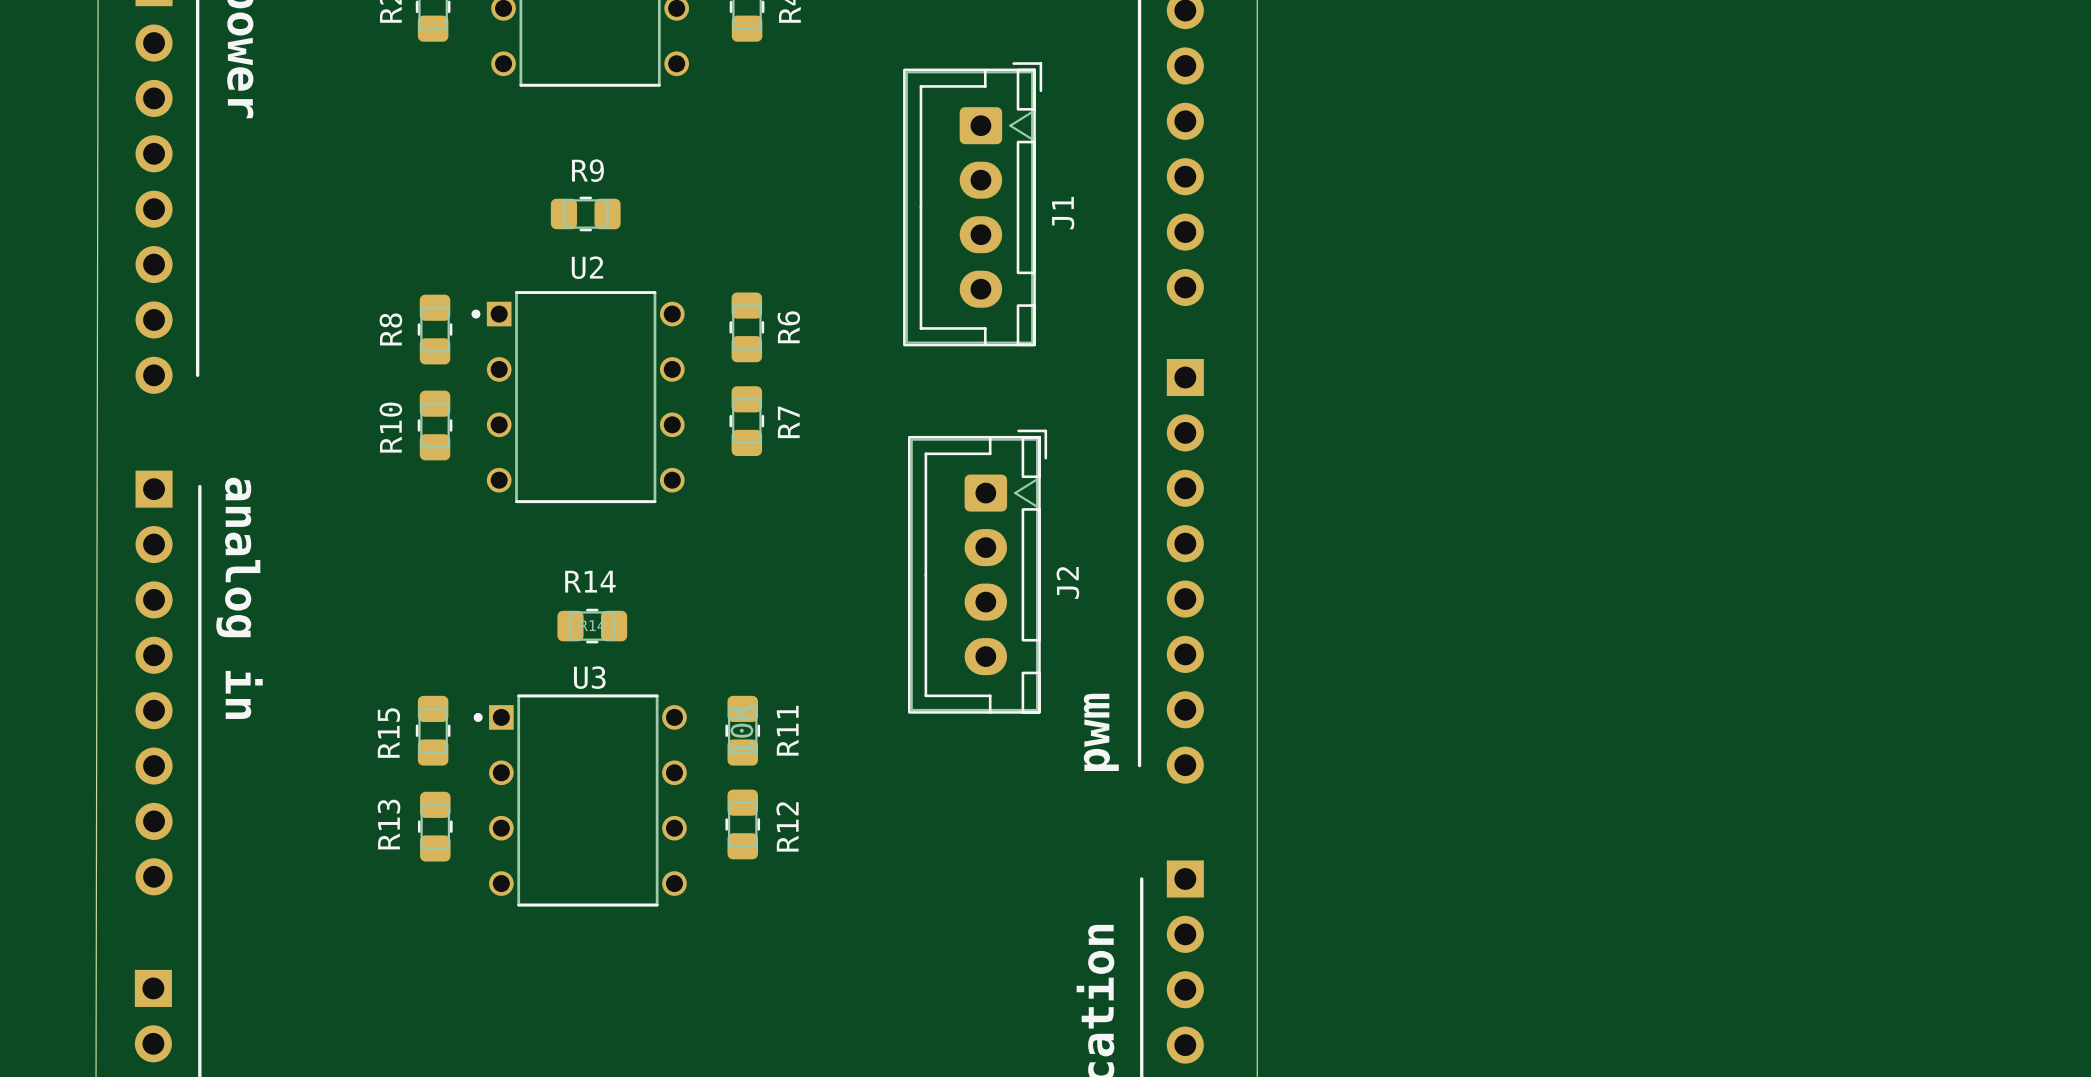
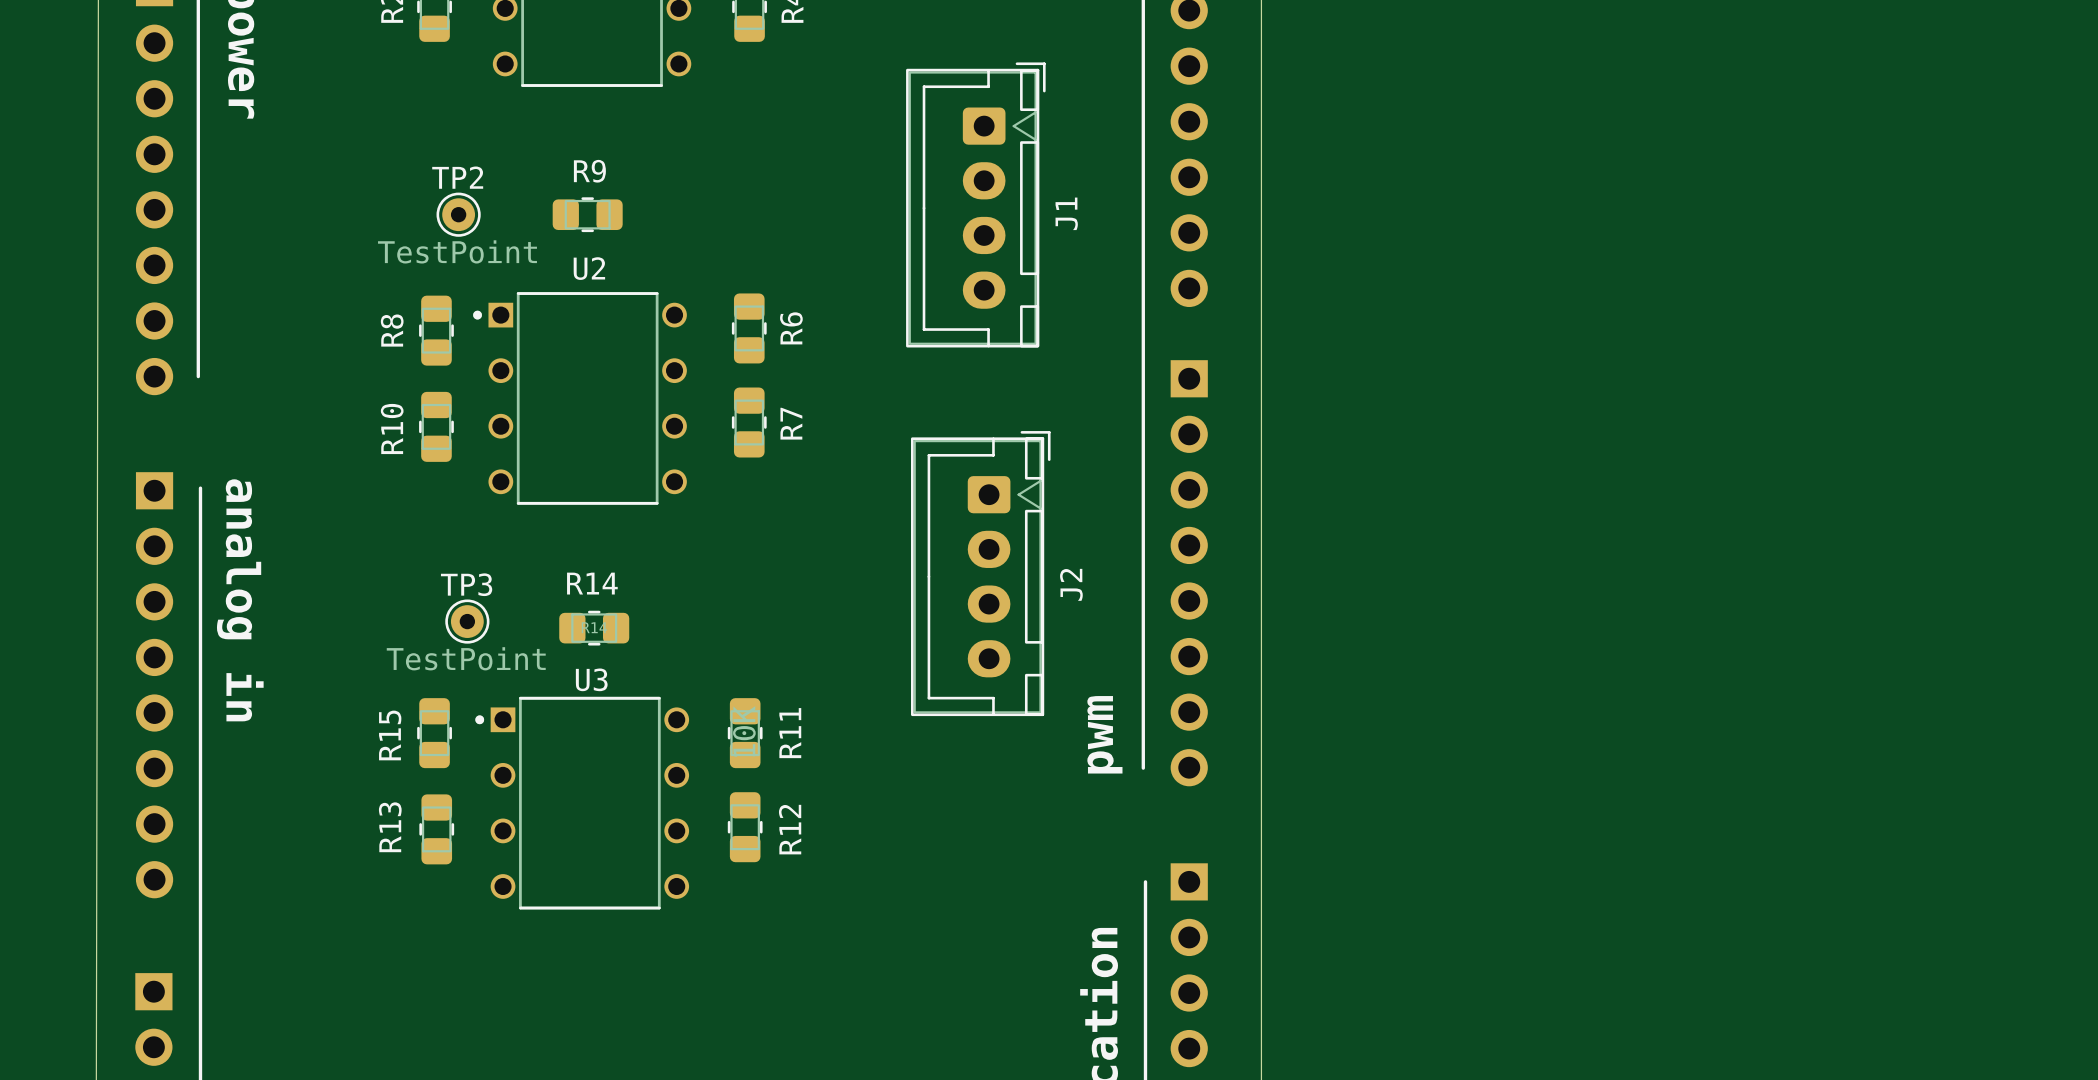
TP2: none -> TestPoint (458, 214)
TP3: none -> TestPoint (467, 621)

